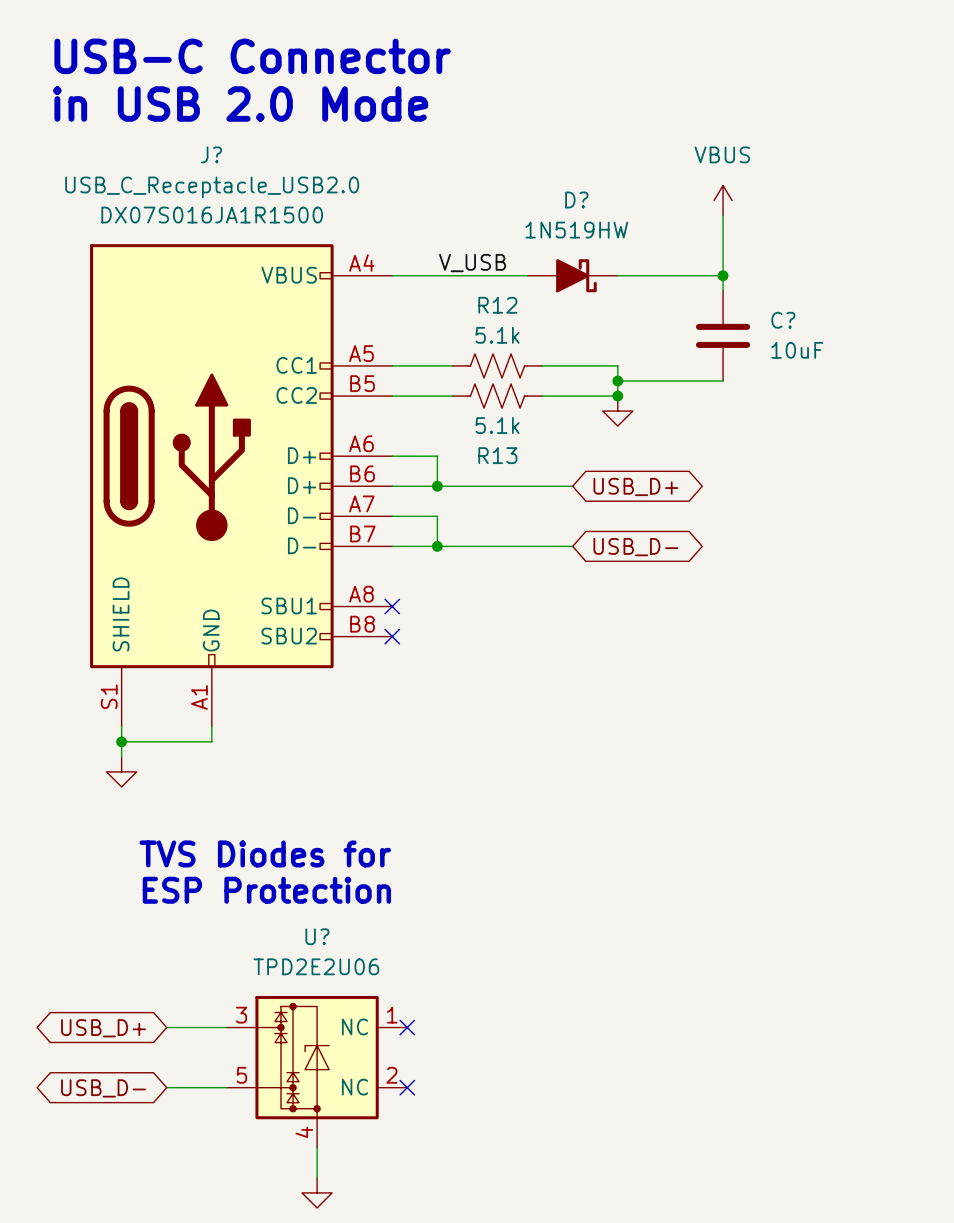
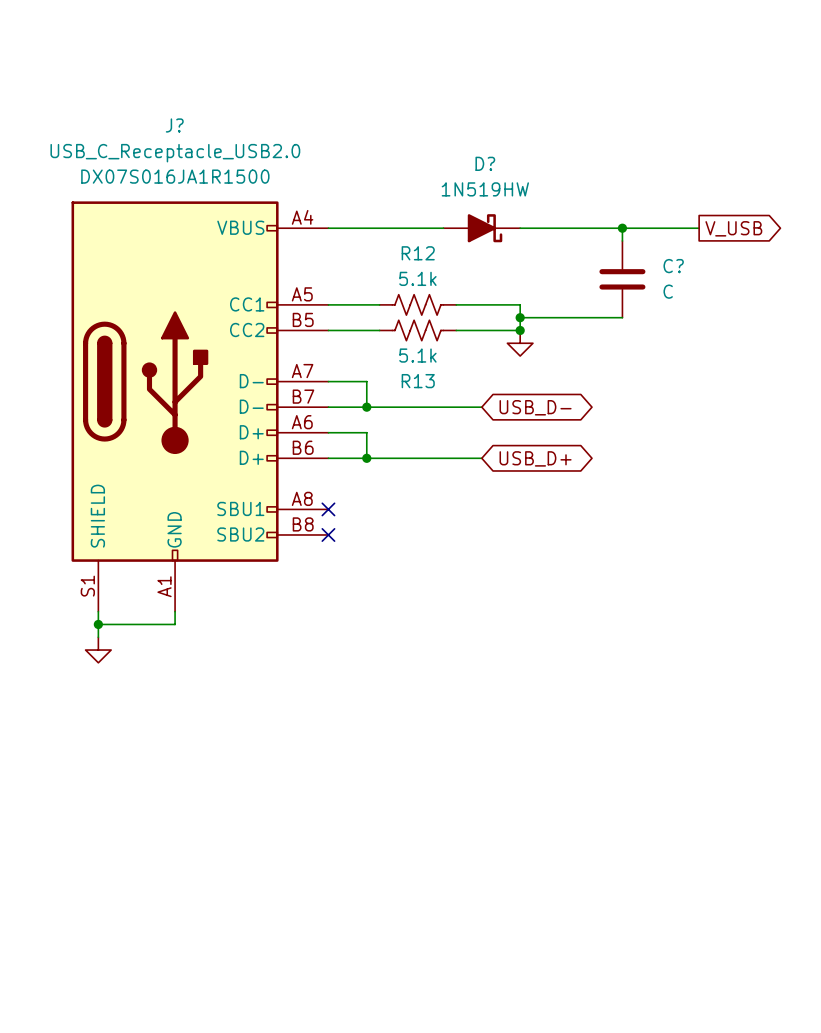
text: USB-C Connector (252, 56) -> none
text: in USB 2.0 Mode (240, 104) -> none
power symbol: VBUS (723, 200) -> none
wire: (723, 215) (723, 290) -> none
label: V_USB (472, 263) -> none
wire: none -> (609, 228) (699, 228)
junction position: (723, 275) -> (622, 228)
wire: none -> (622, 228) (622, 241)
global label: none -> V_USB (733, 228)
C?: 10uF (723, 335) -> none
C?: none -> C (622, 279)
wire: none -> (609, 317) (622, 317)
J? pin number: A6 (361, 443) -> A7 (302, 371)
J? pin name: D+ (302, 455) -> D- (251, 381)
J? pin number: B6 (362, 473) -> B7 (303, 396)
J? pin name: D+ (302, 485) -> D- (251, 406)
global label: USB_D+ (635, 486) -> USB_D- (535, 407)
J? pin number: A7 (361, 503) -> A6 (302, 422)
J? pin name: D- (302, 515) -> D+ (251, 432)
J? pin number: B7 (362, 533) -> B6 (303, 447)
J? pin name: D- (302, 545) -> D+ (251, 457)
global label: USB_D- (635, 547) -> USB_D+ (535, 458)
text: TVS Diodes for (265, 853) -> none
text: ESP Protection (266, 890) -> none
wire: (166, 1027) (226, 1027) -> none
no-connect mark: (407, 1027) -> none
global label: USB_D+ (103, 1028) -> none
U?: TPD2E2U06 (317, 1071) -> none
wire: (166, 1087) (226, 1087) -> none
no-connect mark: (407, 1087) -> none
global label: USB_D- (103, 1088) -> none
wire: (317, 1147) (317, 1177) -> none
power symbol: (317, 1192) -> none

